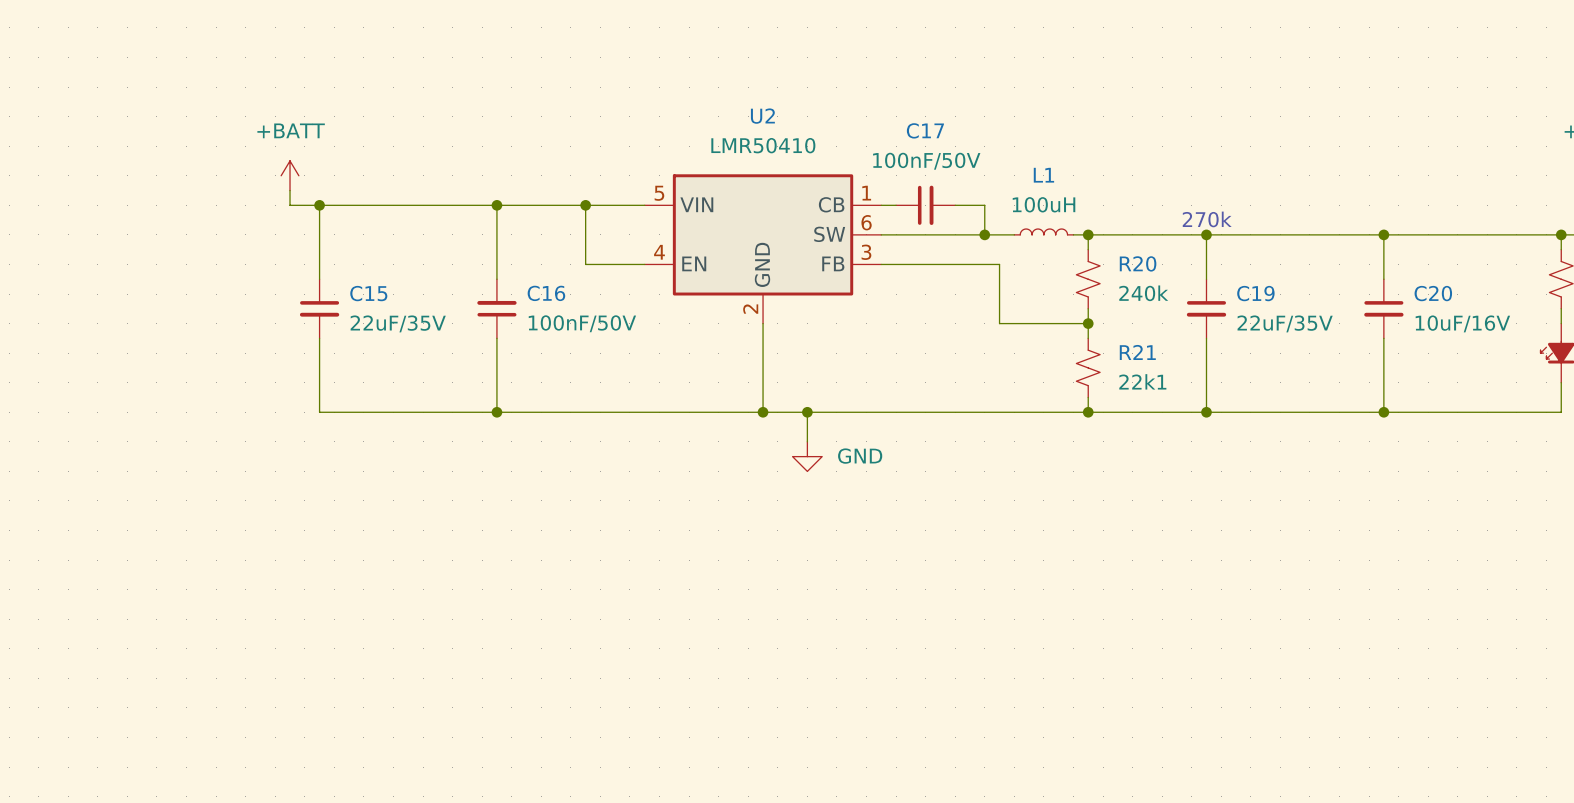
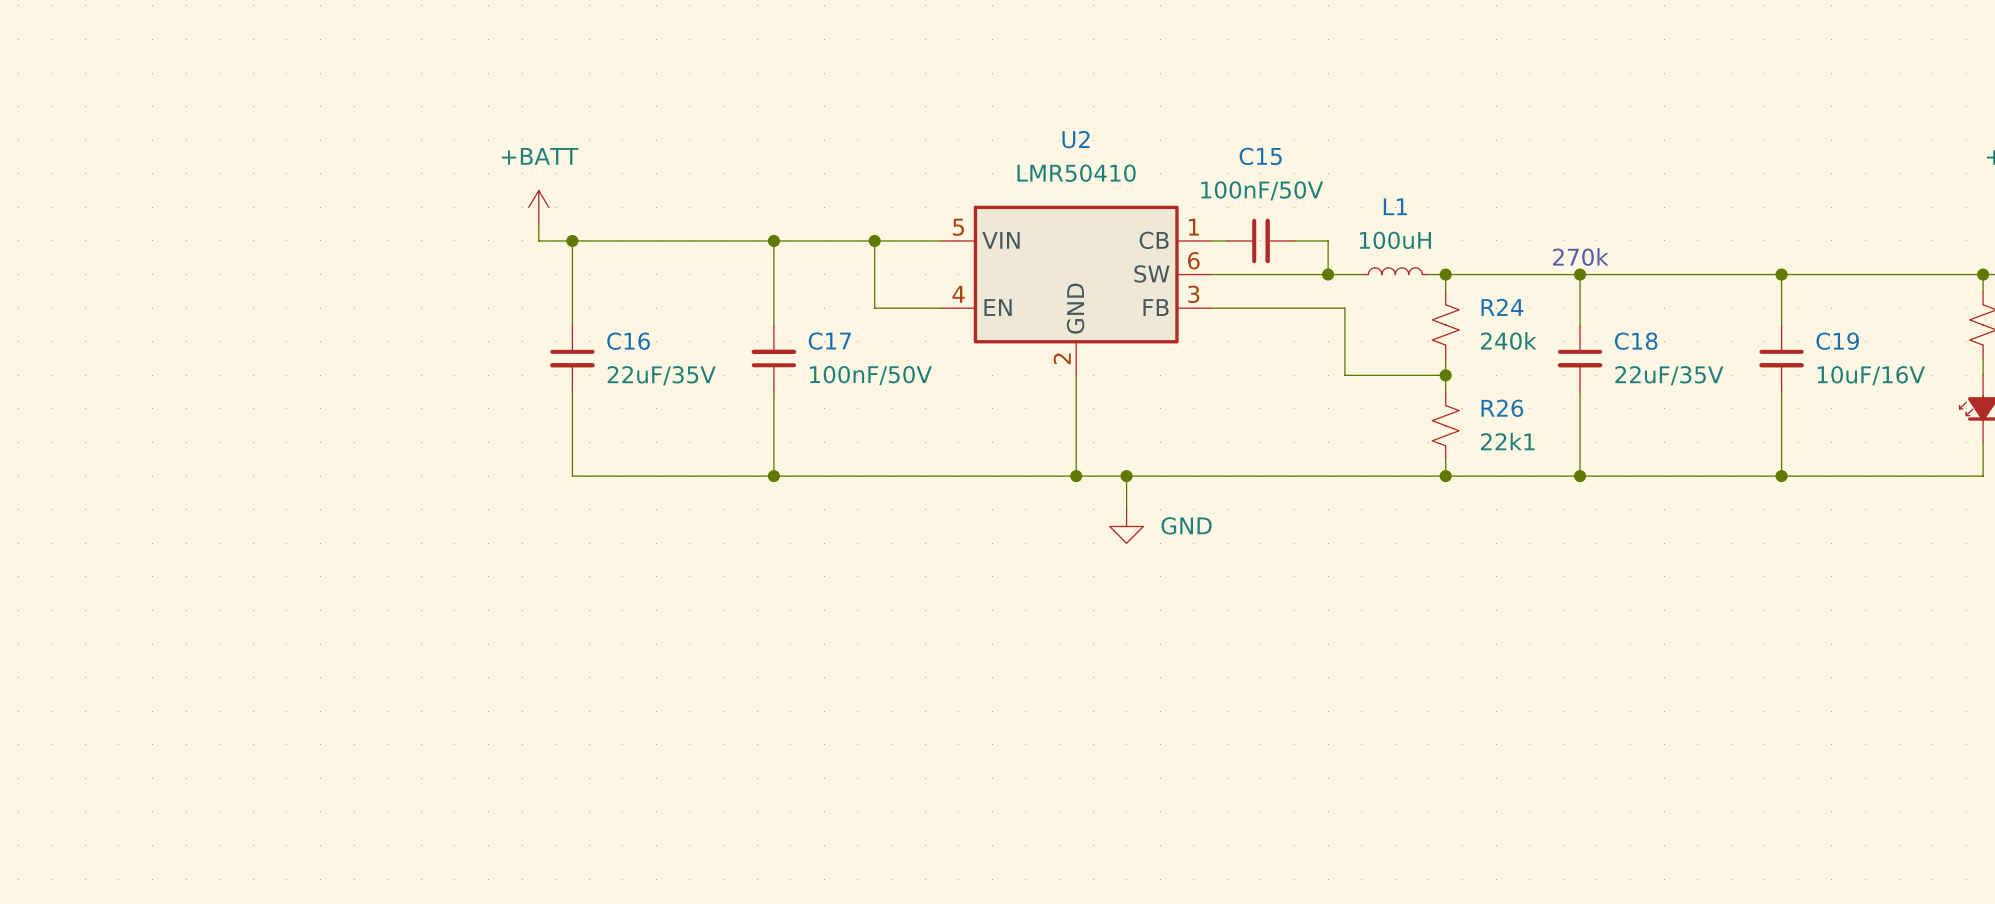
C17 name: C17 (925, 130) -> C15 (1260, 156)
R20 name: R20 (1138, 263) -> R24 (1502, 307)
C15 name: C15 (368, 293) -> C16 (628, 341)
C16 name: C16 (546, 293) -> C17 (829, 341)
C19 name: C19 (1255, 293) -> C18 (1636, 341)
C20 name: C20 (1433, 293) -> C19 (1837, 341)
R21 name: R21 (1137, 352) -> R26 (1502, 408)

